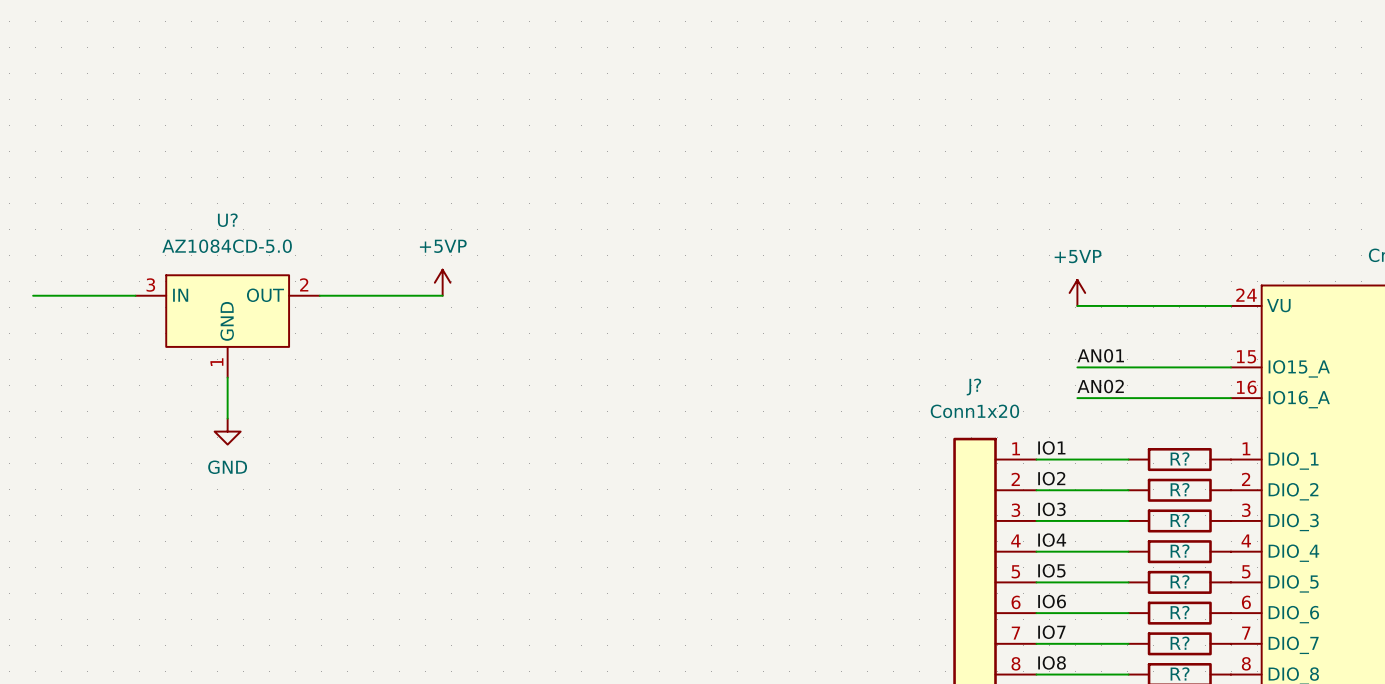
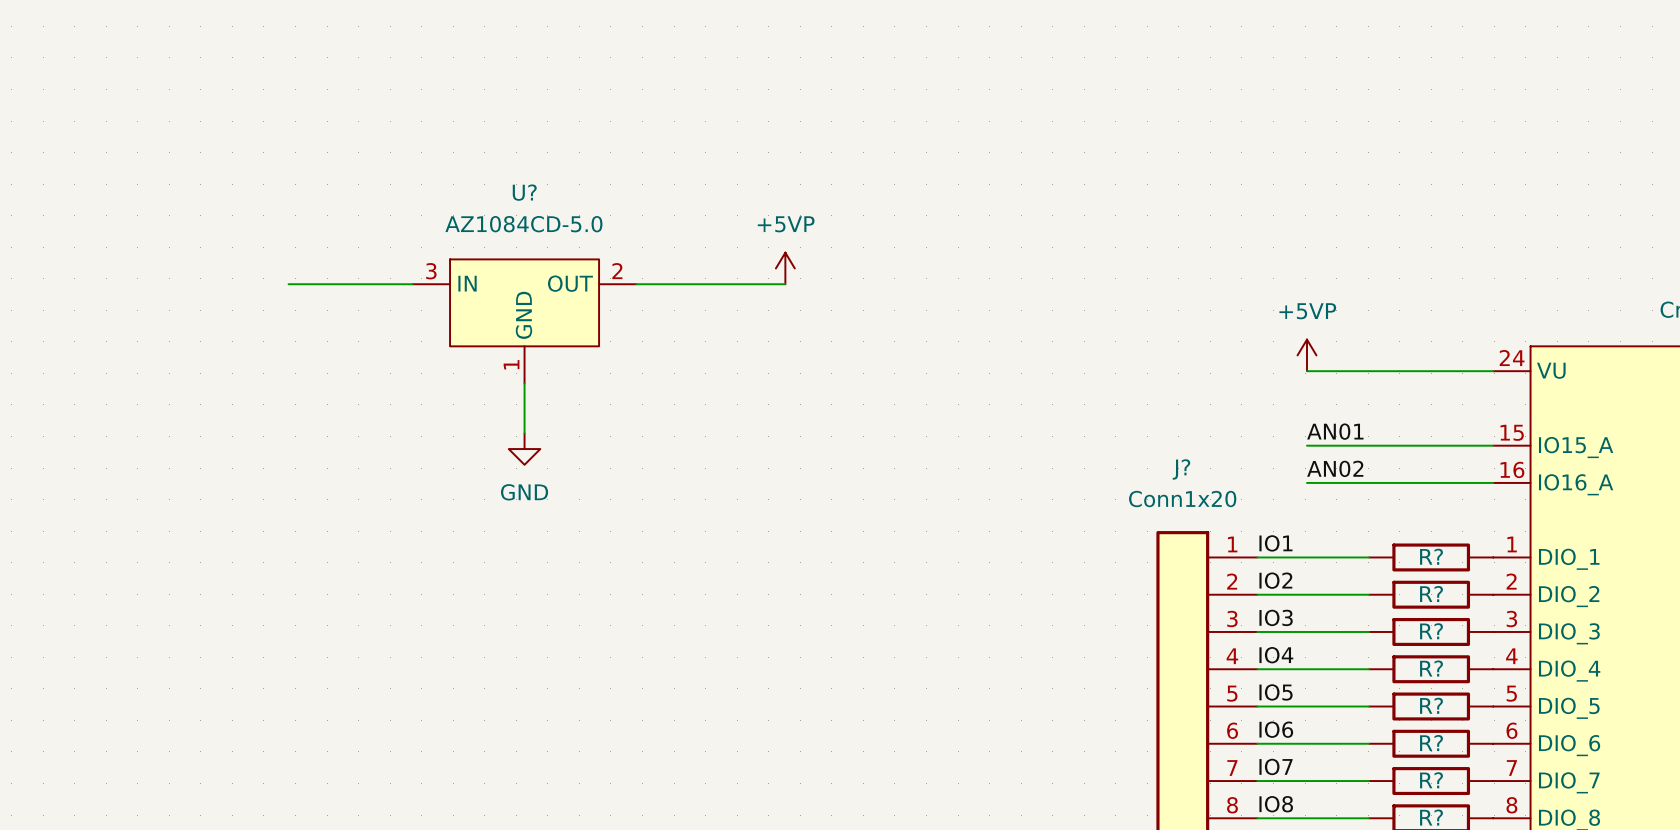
power symbol position: +5VP (442, 282) -> +5VP (785, 268)
wire: (33, 295) (135, 295) -> (288, 284) (412, 284)
wire: (319, 295) (442, 295) -> (636, 284) (785, 284)
U? position: (227, 326) -> (524, 321)
wire: (227, 377) (227, 418) -> (524, 383) (524, 433)
power symbol position: GND (227, 431) -> GND (524, 449)

